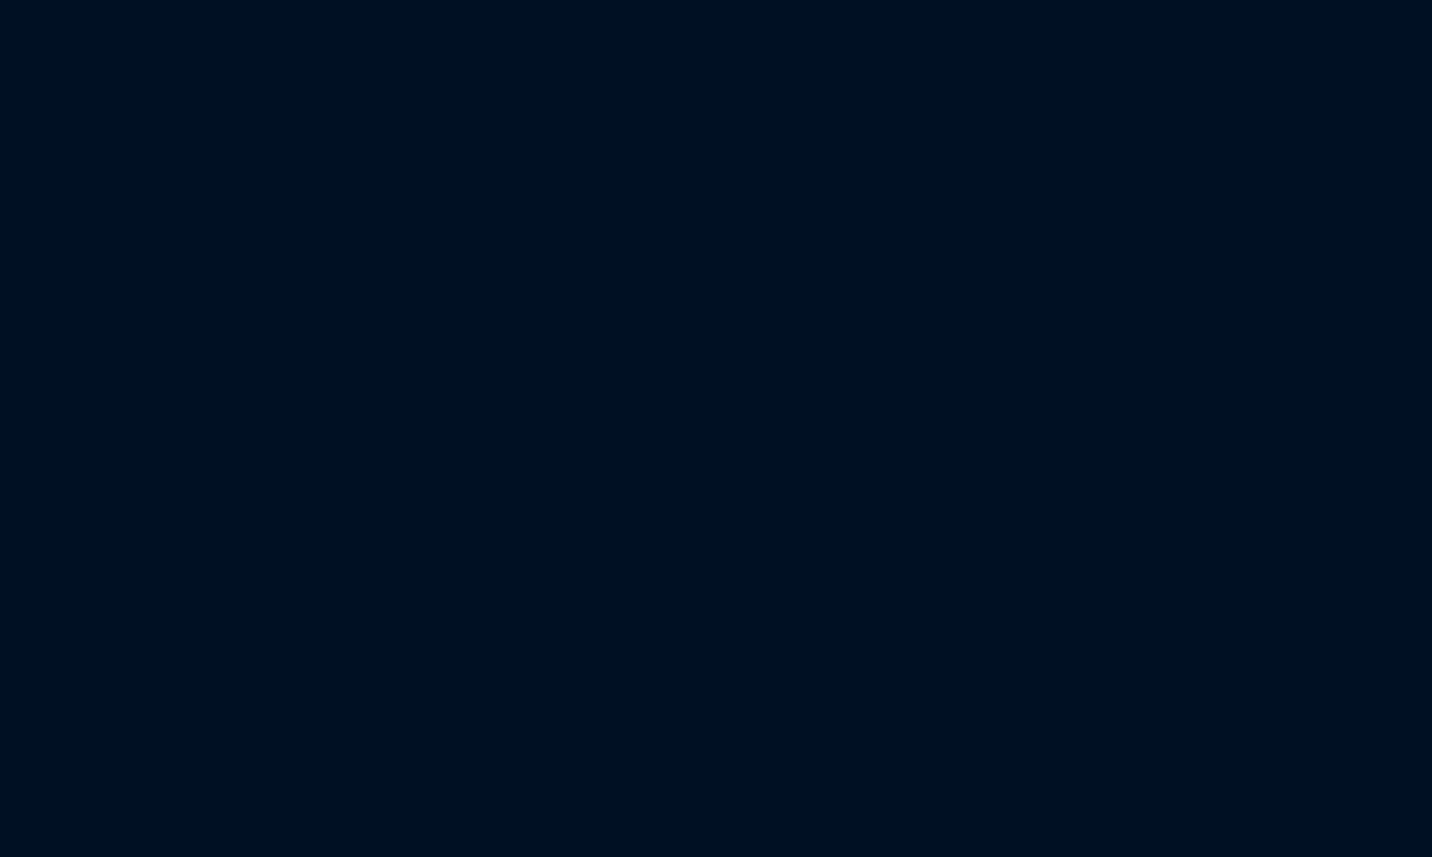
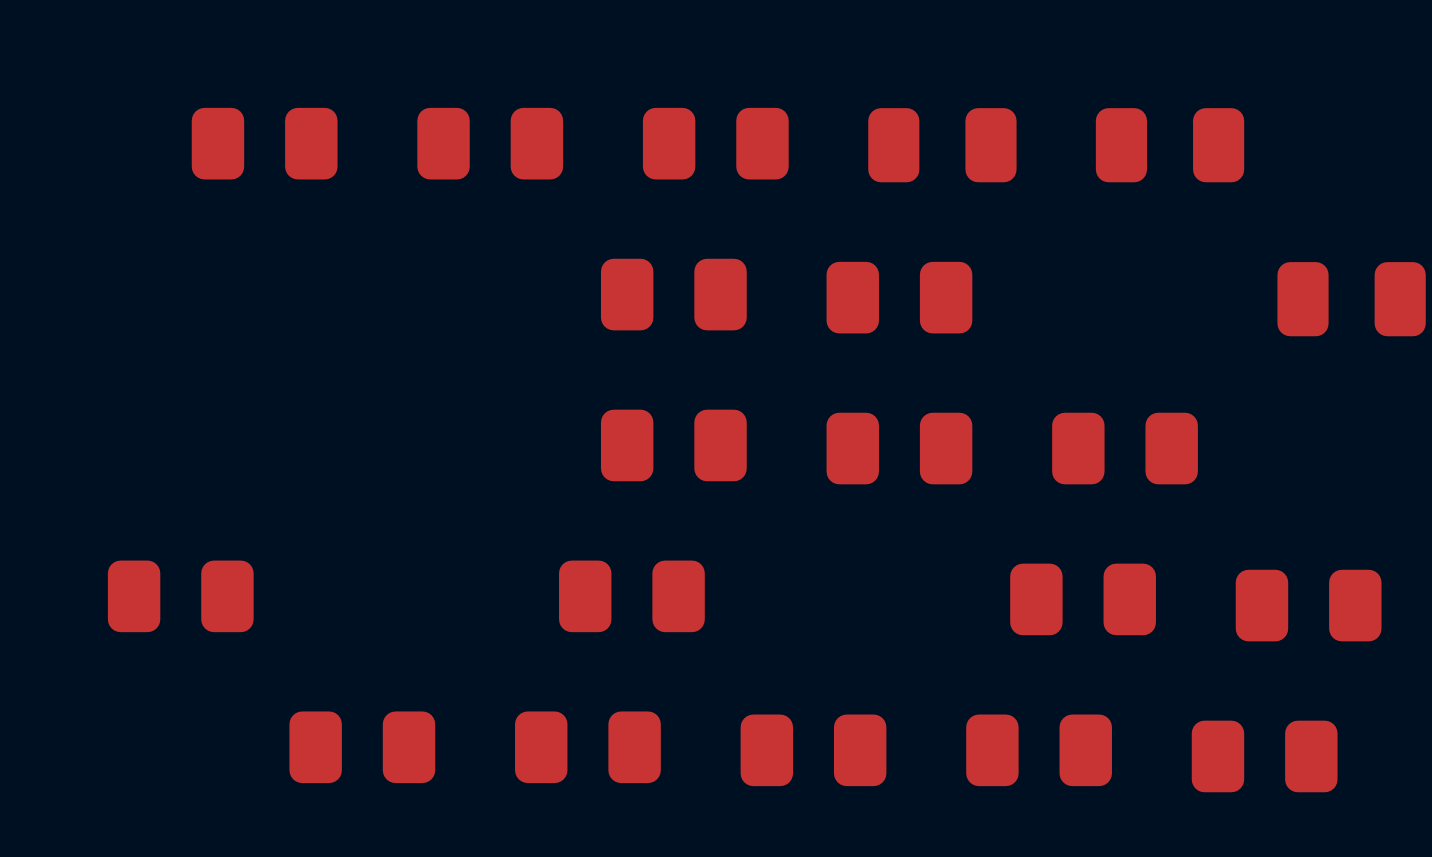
part: none -> (264, 143)
part: none -> (490, 143)
part: none -> (715, 143)
part: none -> (942, 145)
part: none -> (1170, 145)
part: none -> (673, 294)
part: none -> (899, 297)
part: none -> (1351, 299)
part: none -> (673, 445)
part: none -> (899, 448)
part: none -> (1125, 448)
part: none -> (180, 596)
part: none -> (631, 596)
part: none -> (1083, 599)
part: none -> (1308, 605)
part: none -> (362, 747)
part: none -> (587, 747)
part: none -> (813, 750)
part: none -> (1039, 750)
part: none -> (1264, 756)

